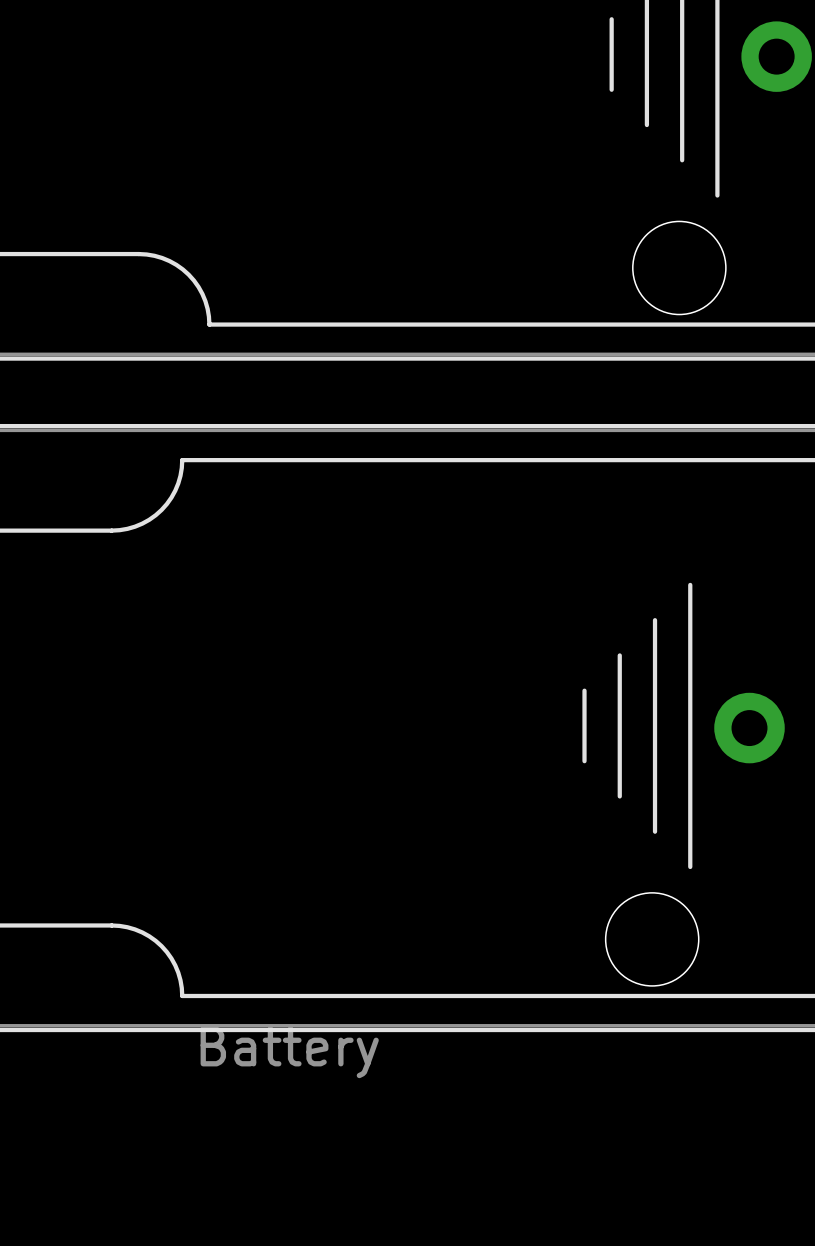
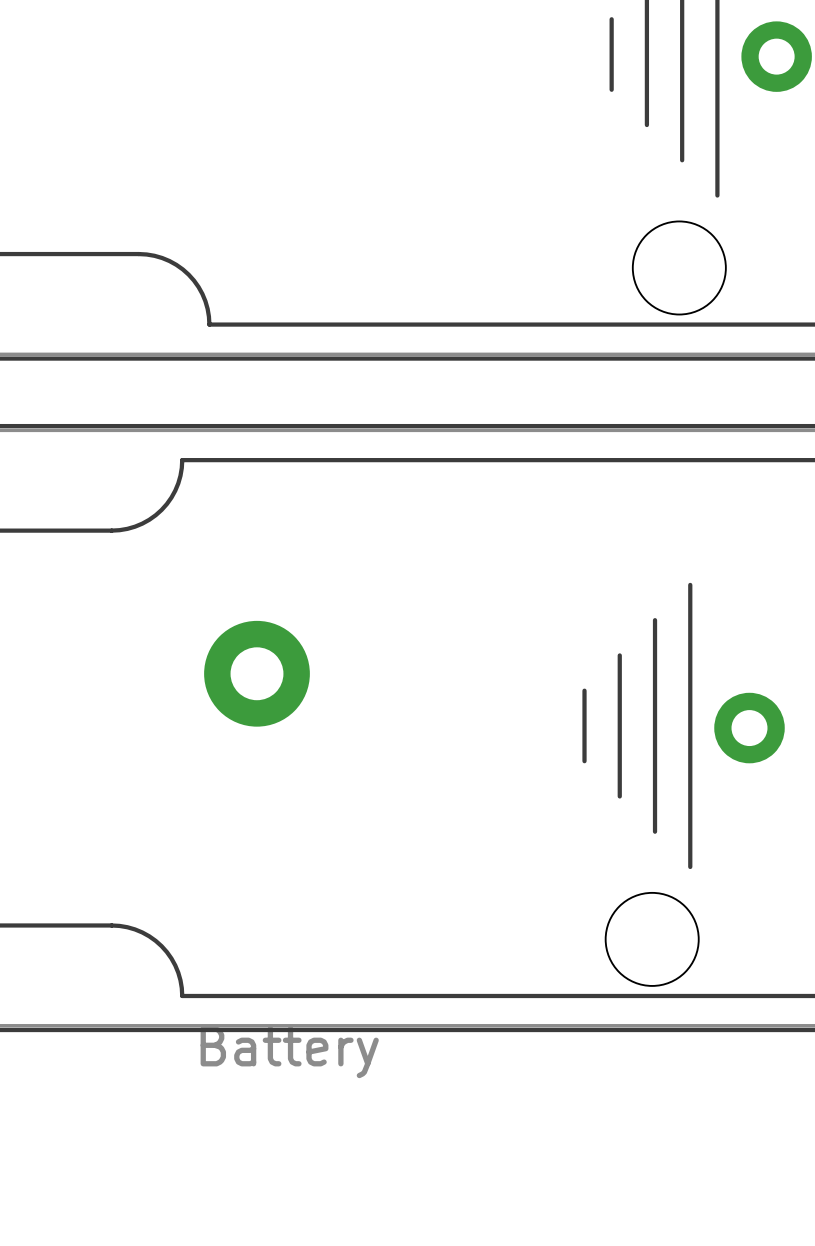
part: none -> (256, 673)

